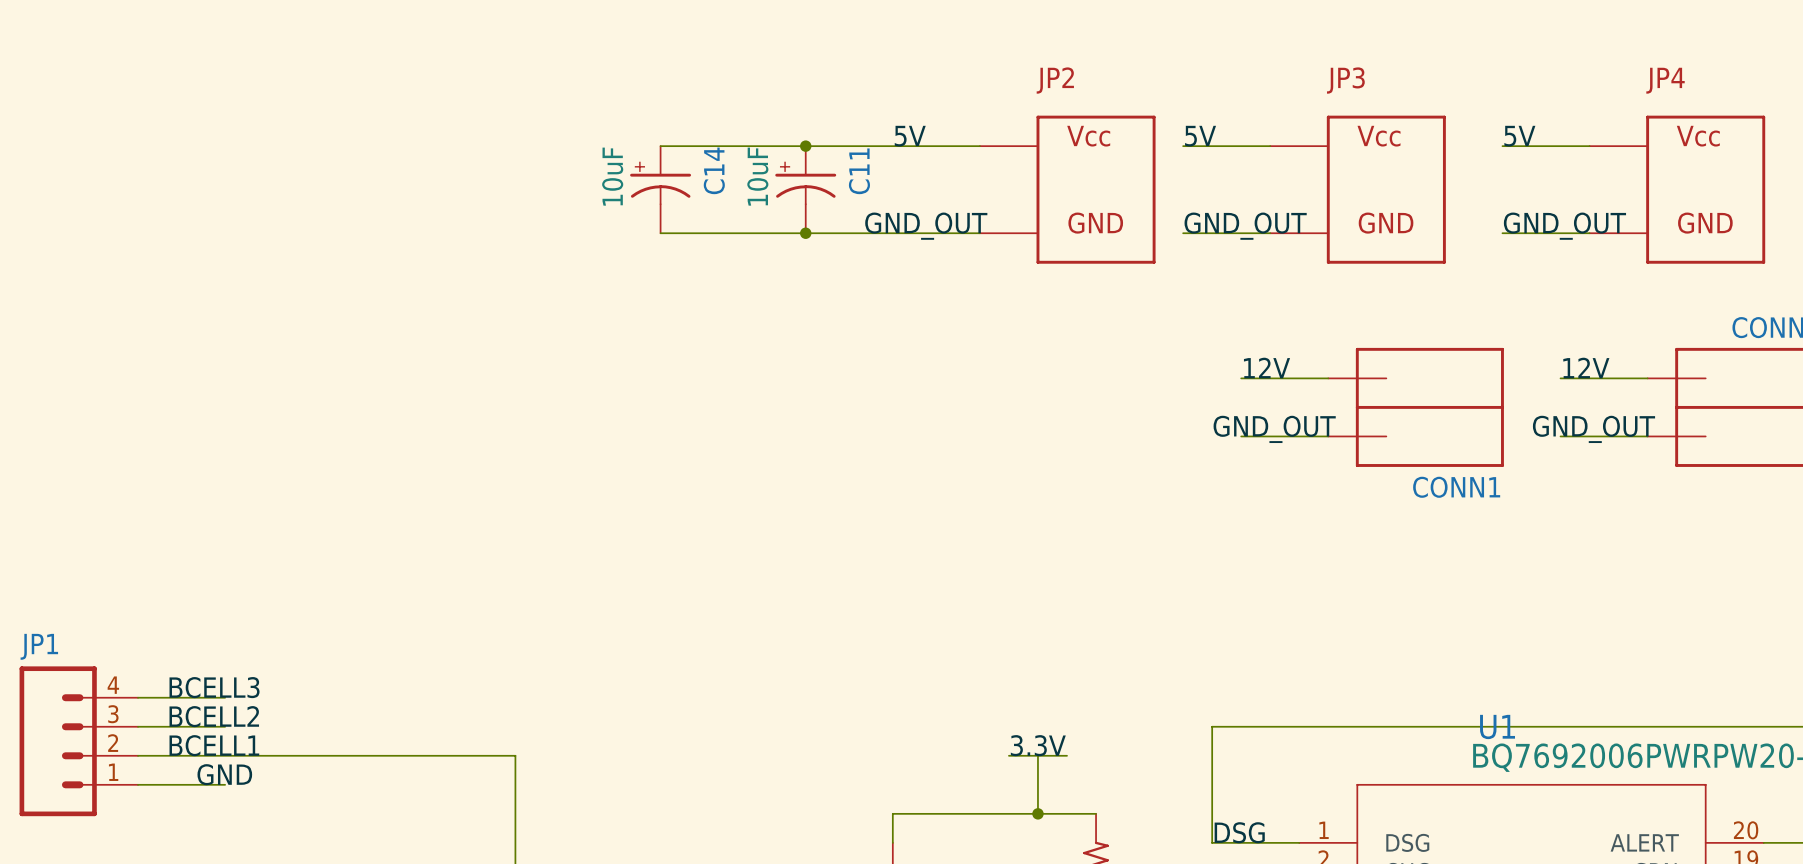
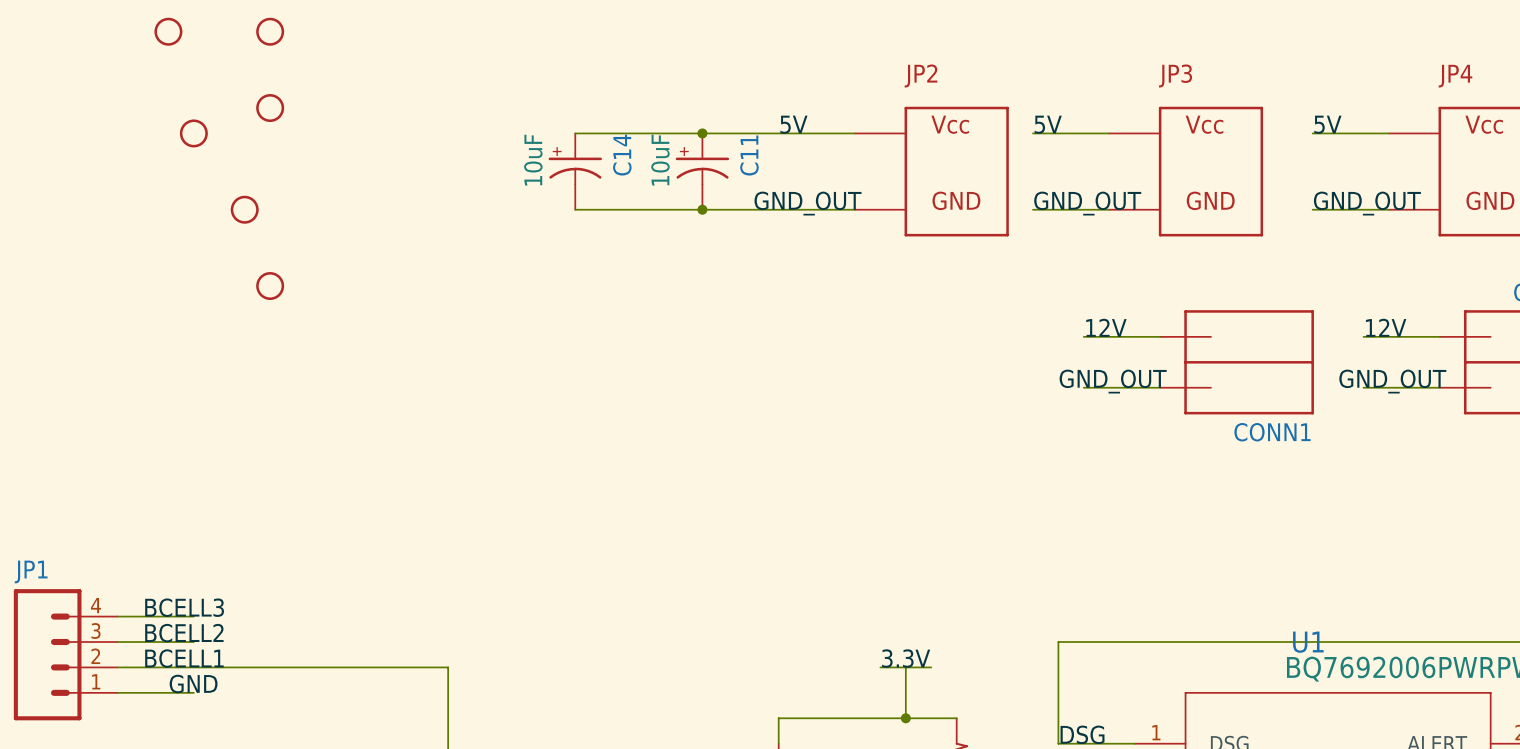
part: none -> (168, 31)
part: none -> (270, 31)
part: none -> (270, 108)
part: none -> (193, 133)
part: none -> (244, 209)
part: none -> (270, 286)

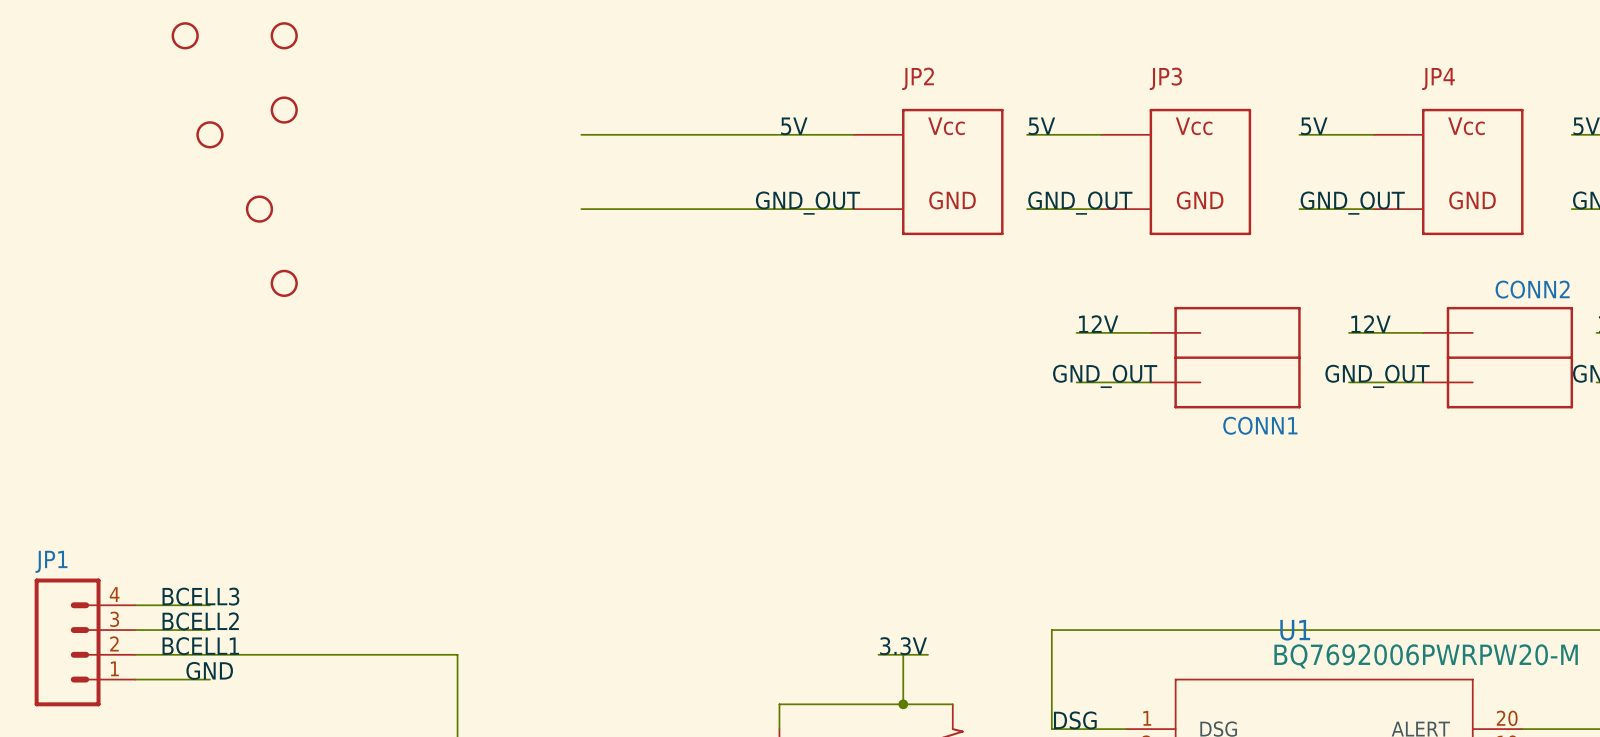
junction: (702, 133) -> none
C14: 10uF (575, 171) -> none
C11: 10uF (702, 171) -> none
junction: (702, 209) -> none

